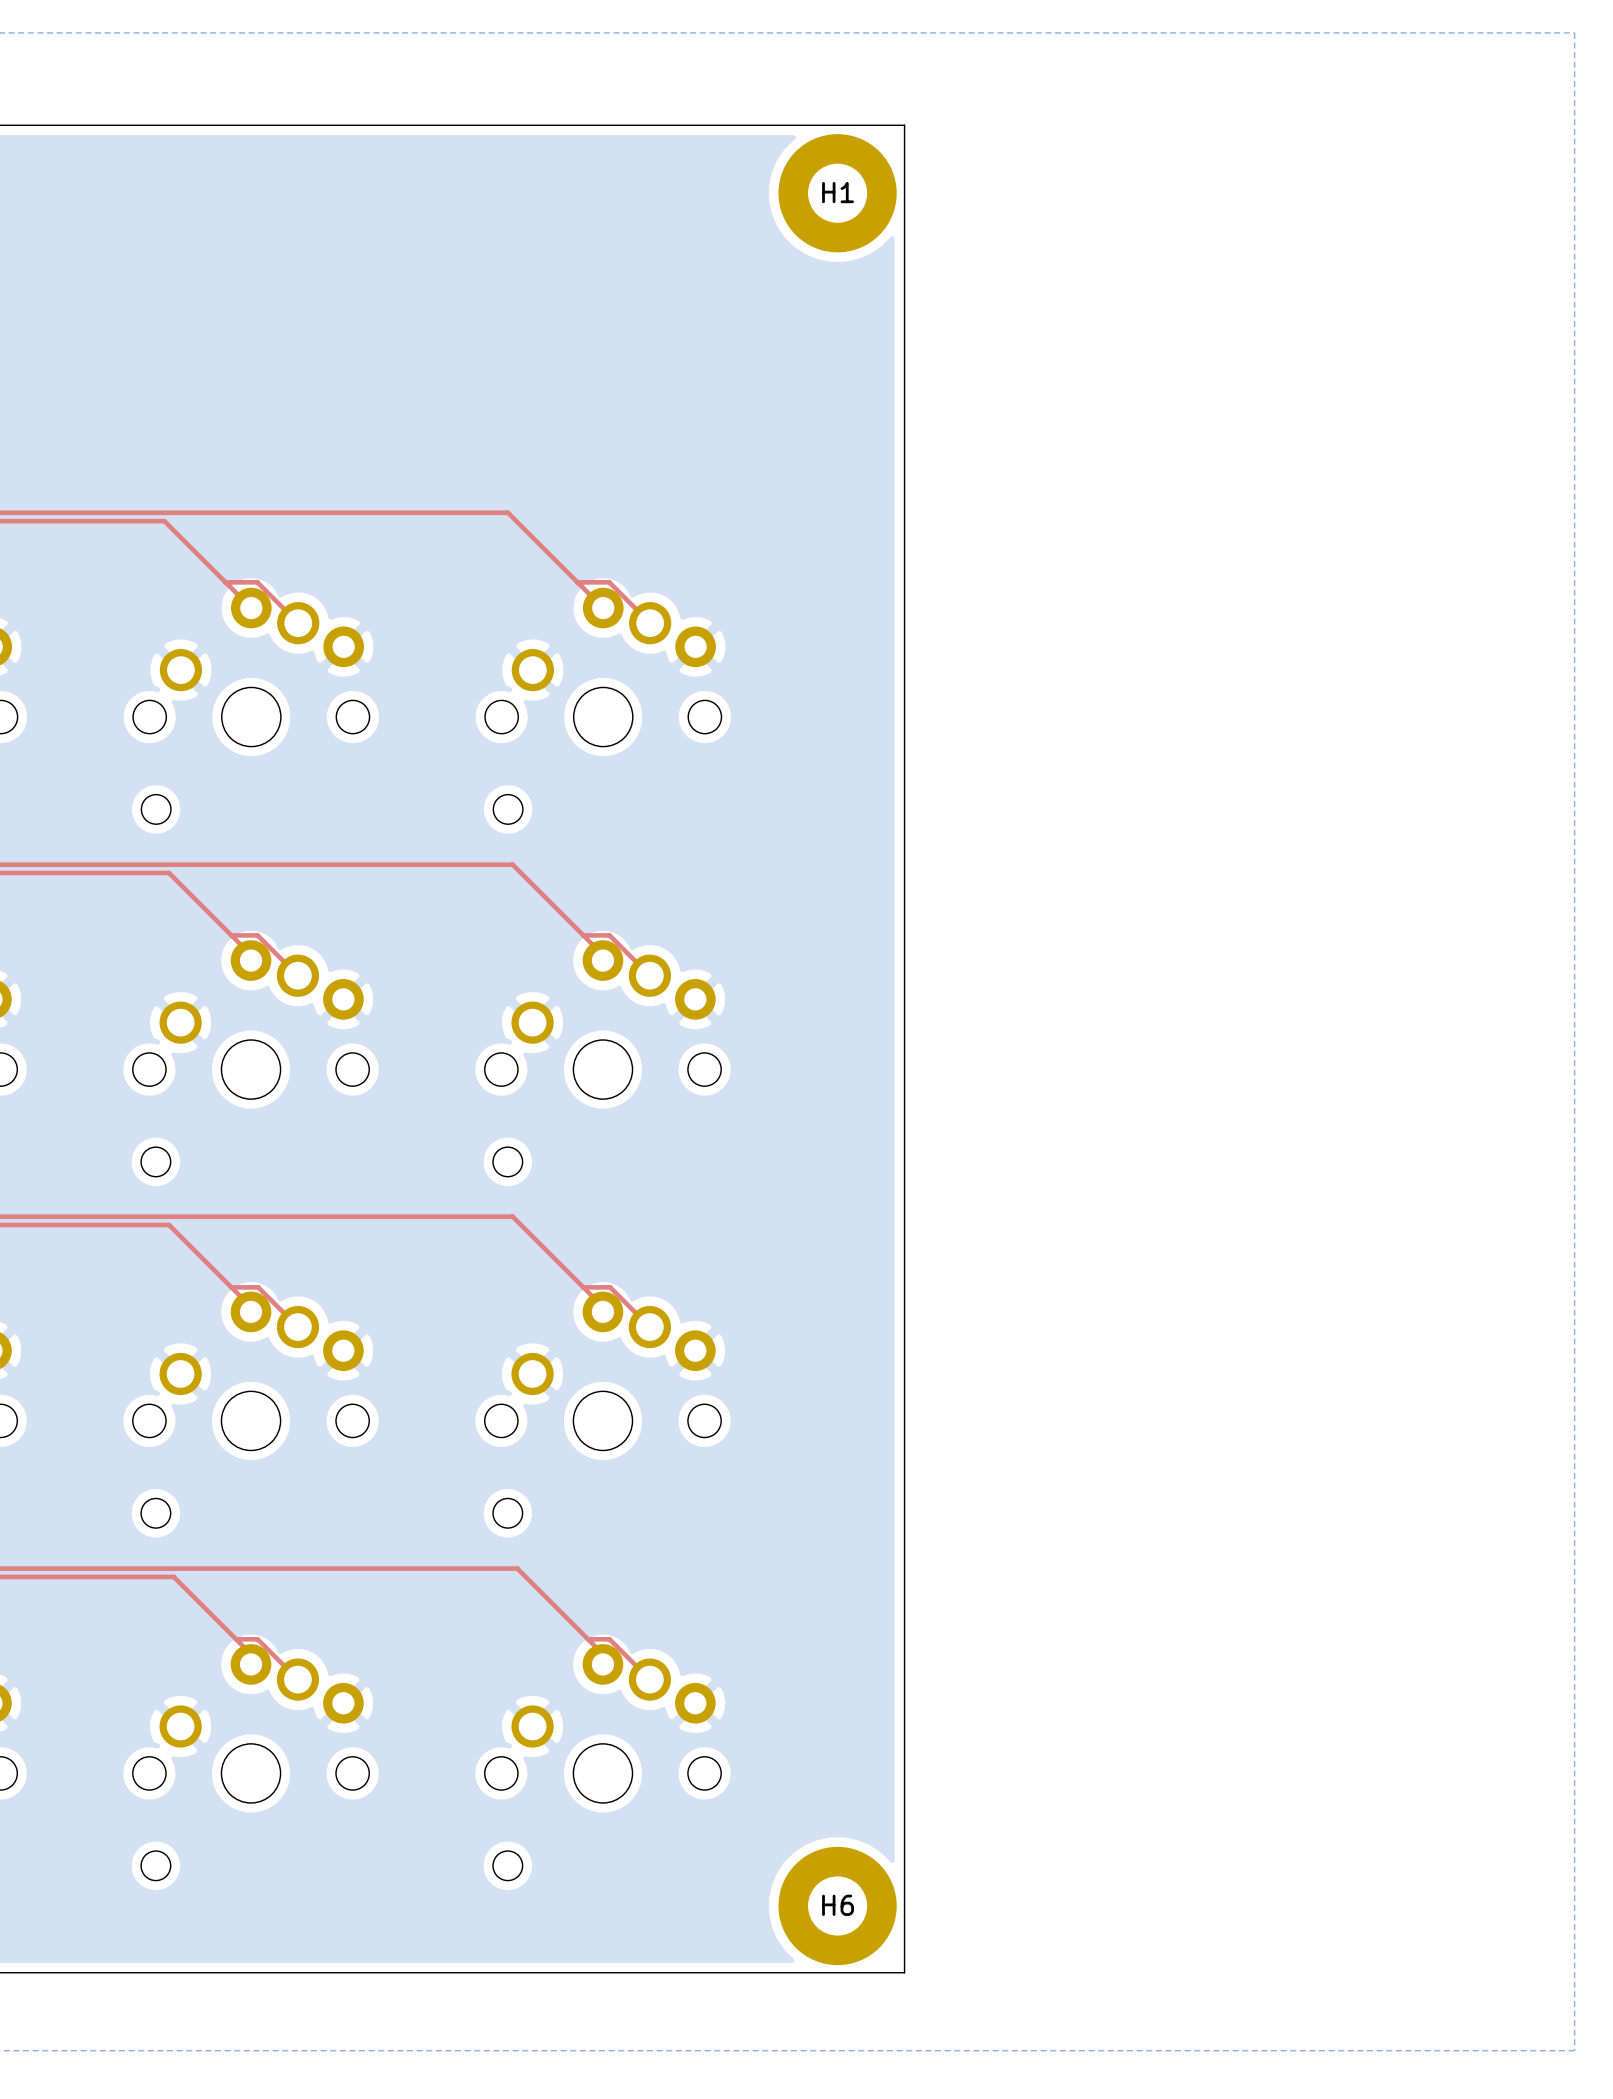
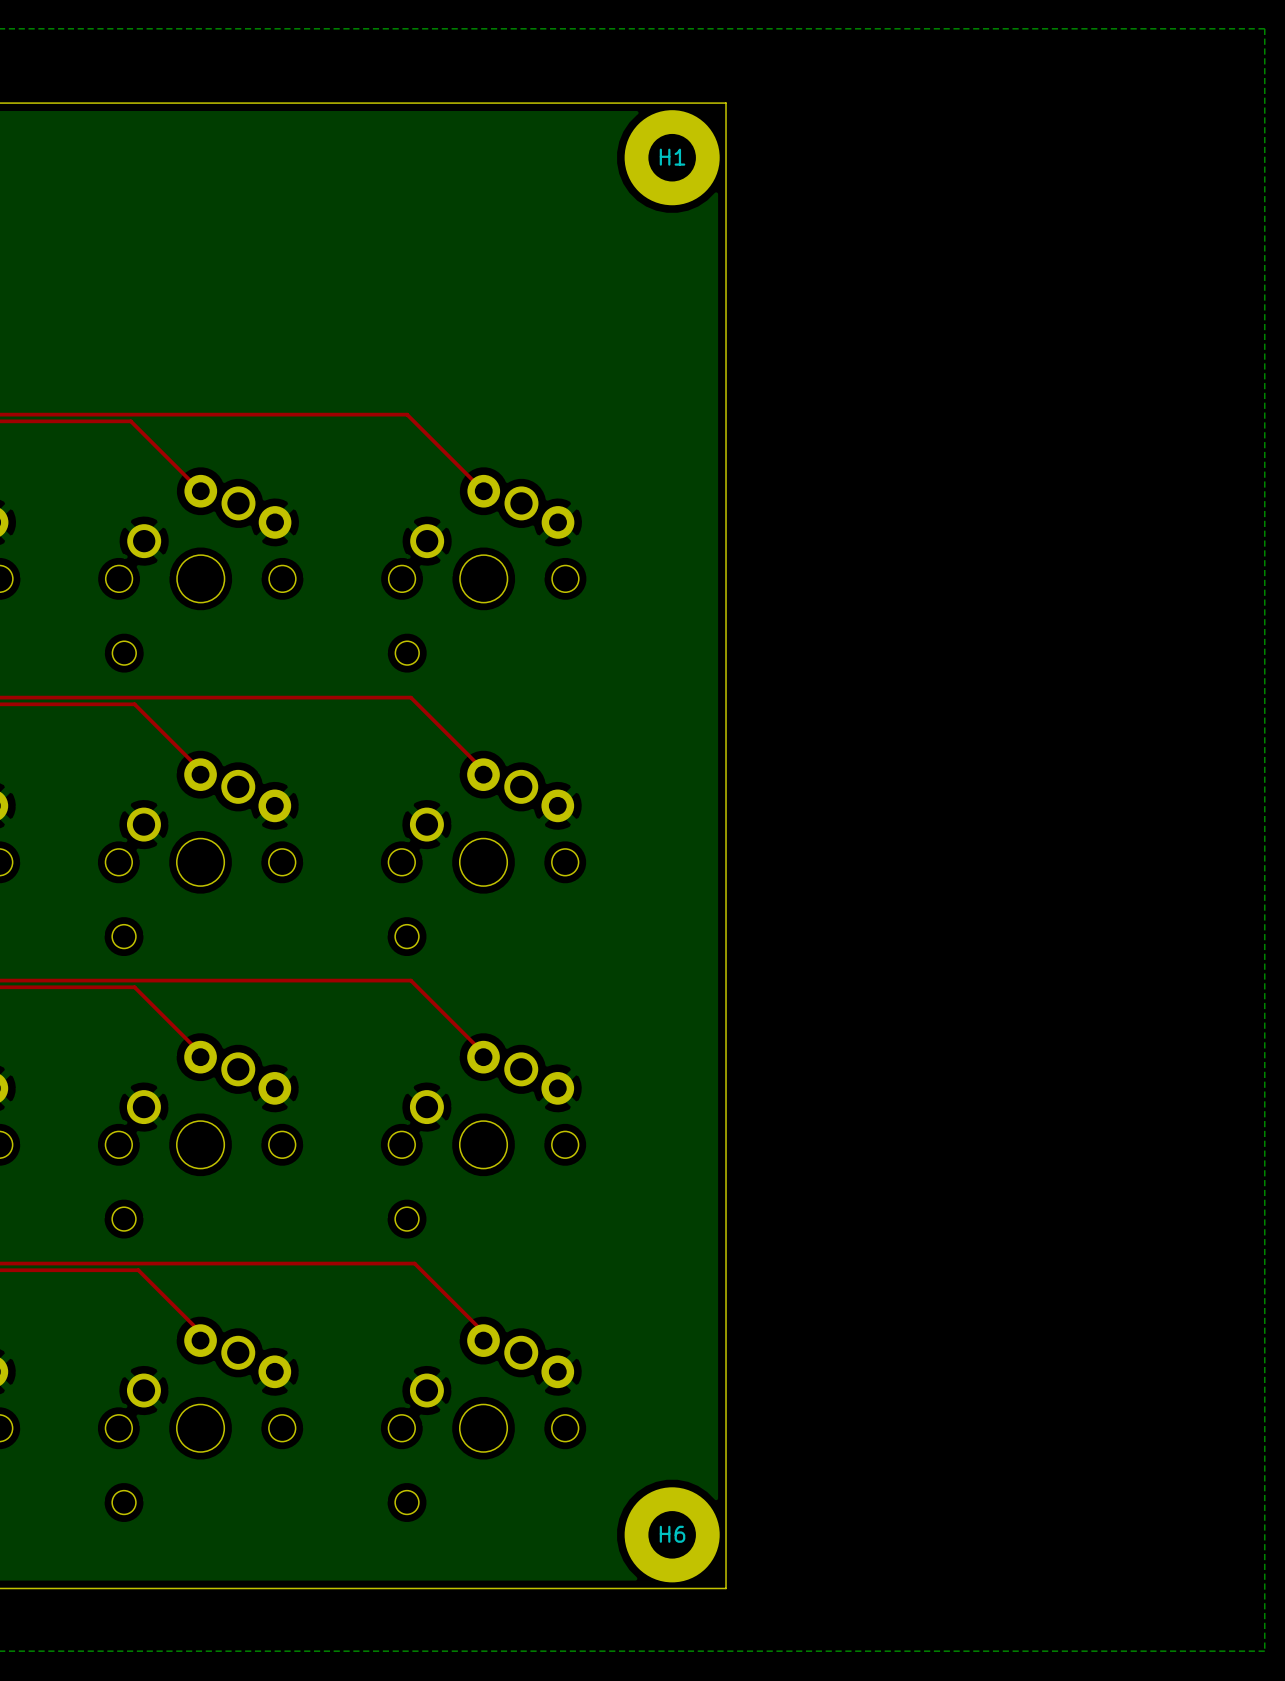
top track: (225, 582) (257, 582) (298, 623) -> none
top track: (577, 582) (609, 582) (650, 623) -> none
top track: (231, 935) (257, 935) (297, 975) -> none
top track: (583, 935) (609, 935) (649, 975) -> none
top track: (231, 1287) (258, 1287) (297, 1327) -> none
top track: (583, 1287) (610, 1287) (649, 1327) -> none
top track: (236, 1639) (257, 1639) (297, 1679) -> none
top track: (588, 1639) (609, 1639) (649, 1679) -> none

